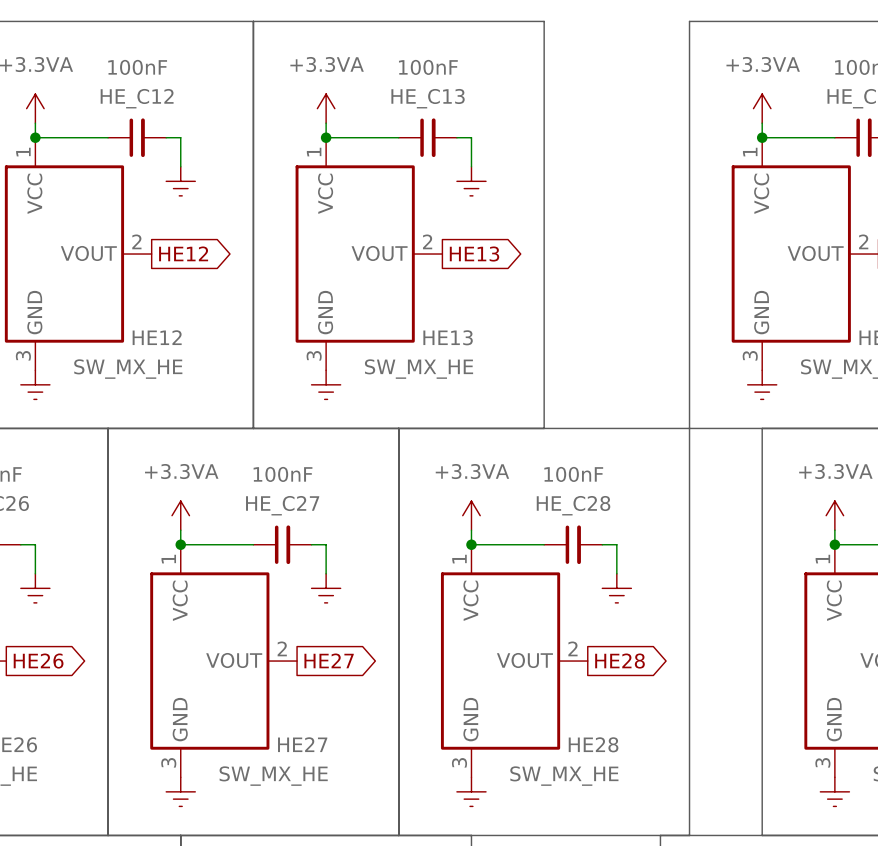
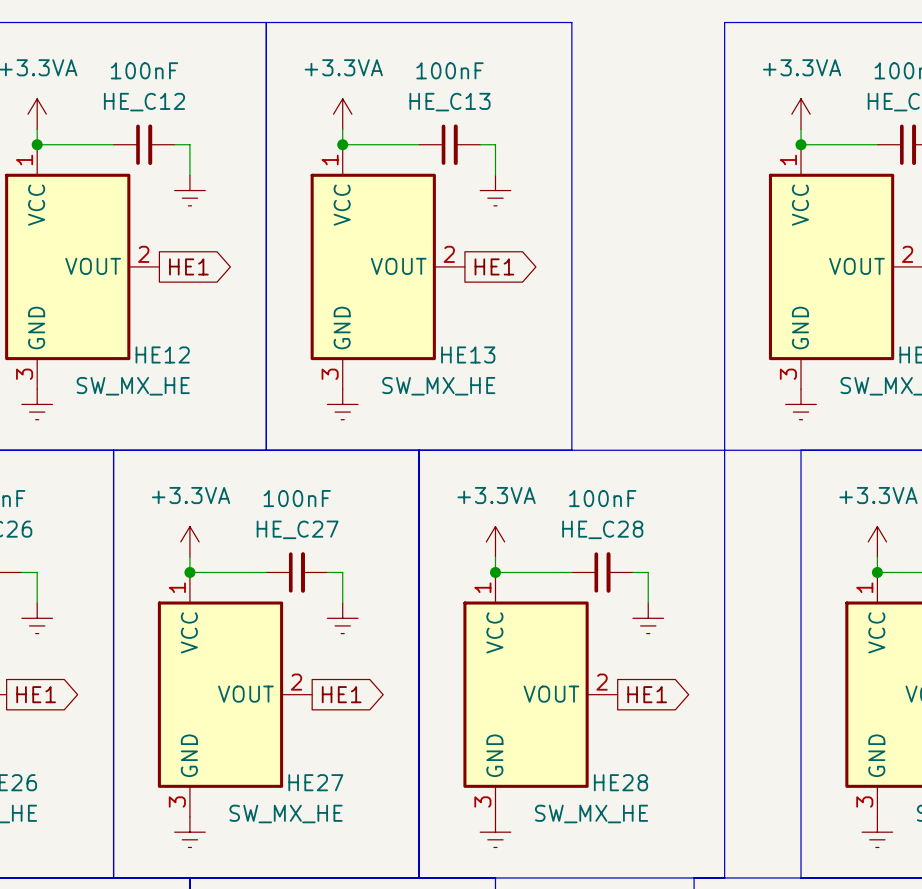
global label: HE12 (183, 253) -> HE1 (188, 266)
global label: HE13 (474, 254) -> HE1 (494, 266)
global label: HE27 (329, 660) -> HE1 (341, 694)
global label: HE26 (38, 661) -> HE1 (36, 694)
global label: HE28 (619, 661) -> HE1 (647, 694)

